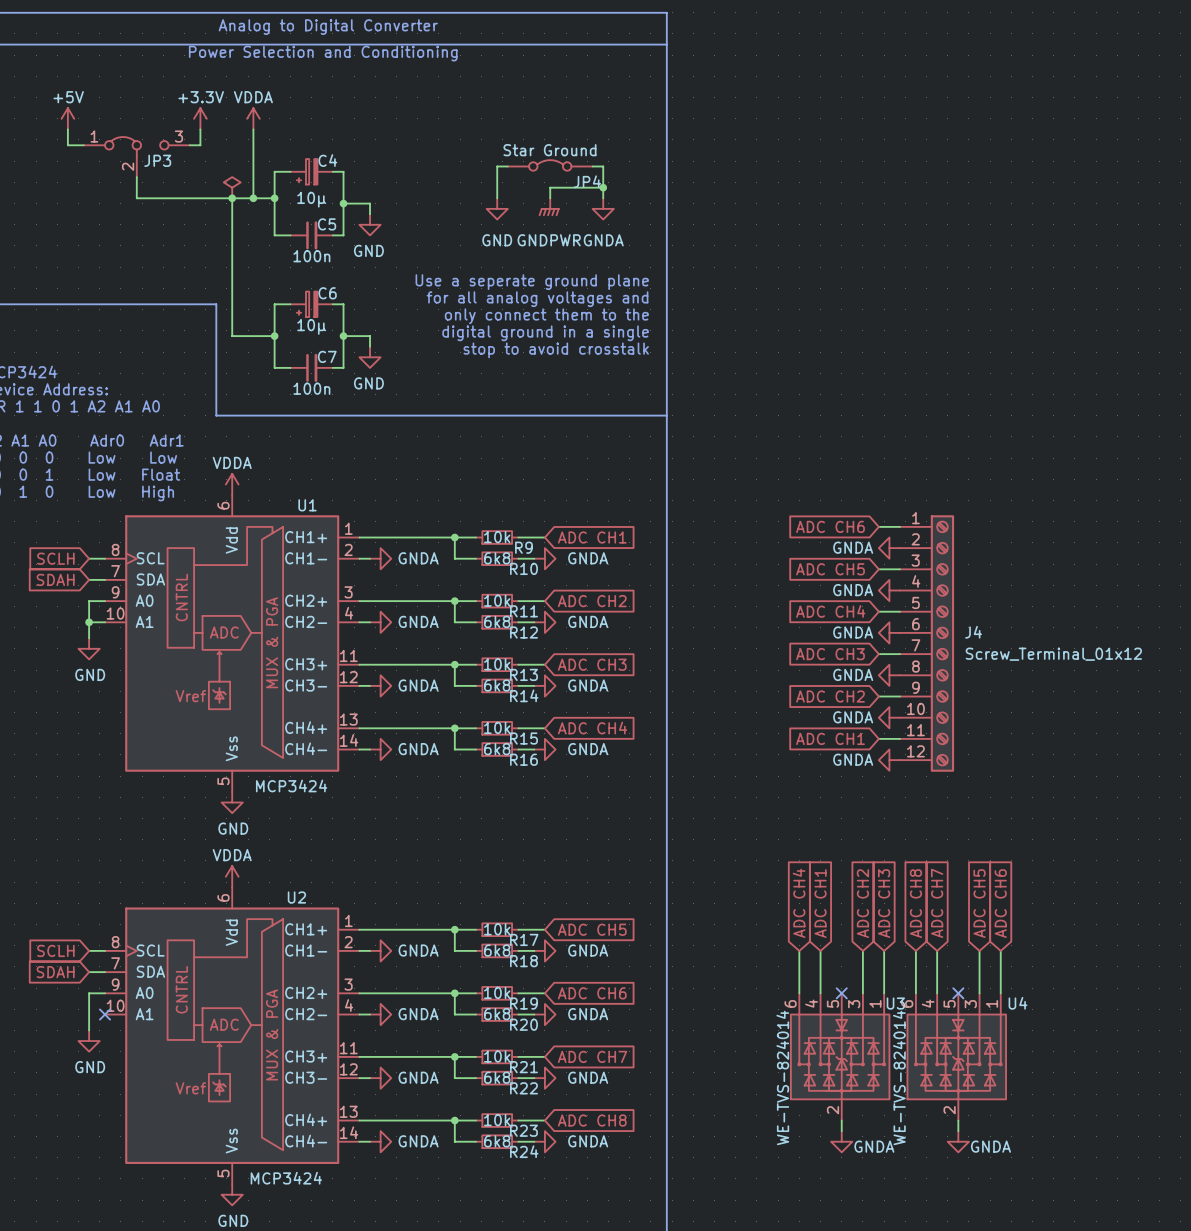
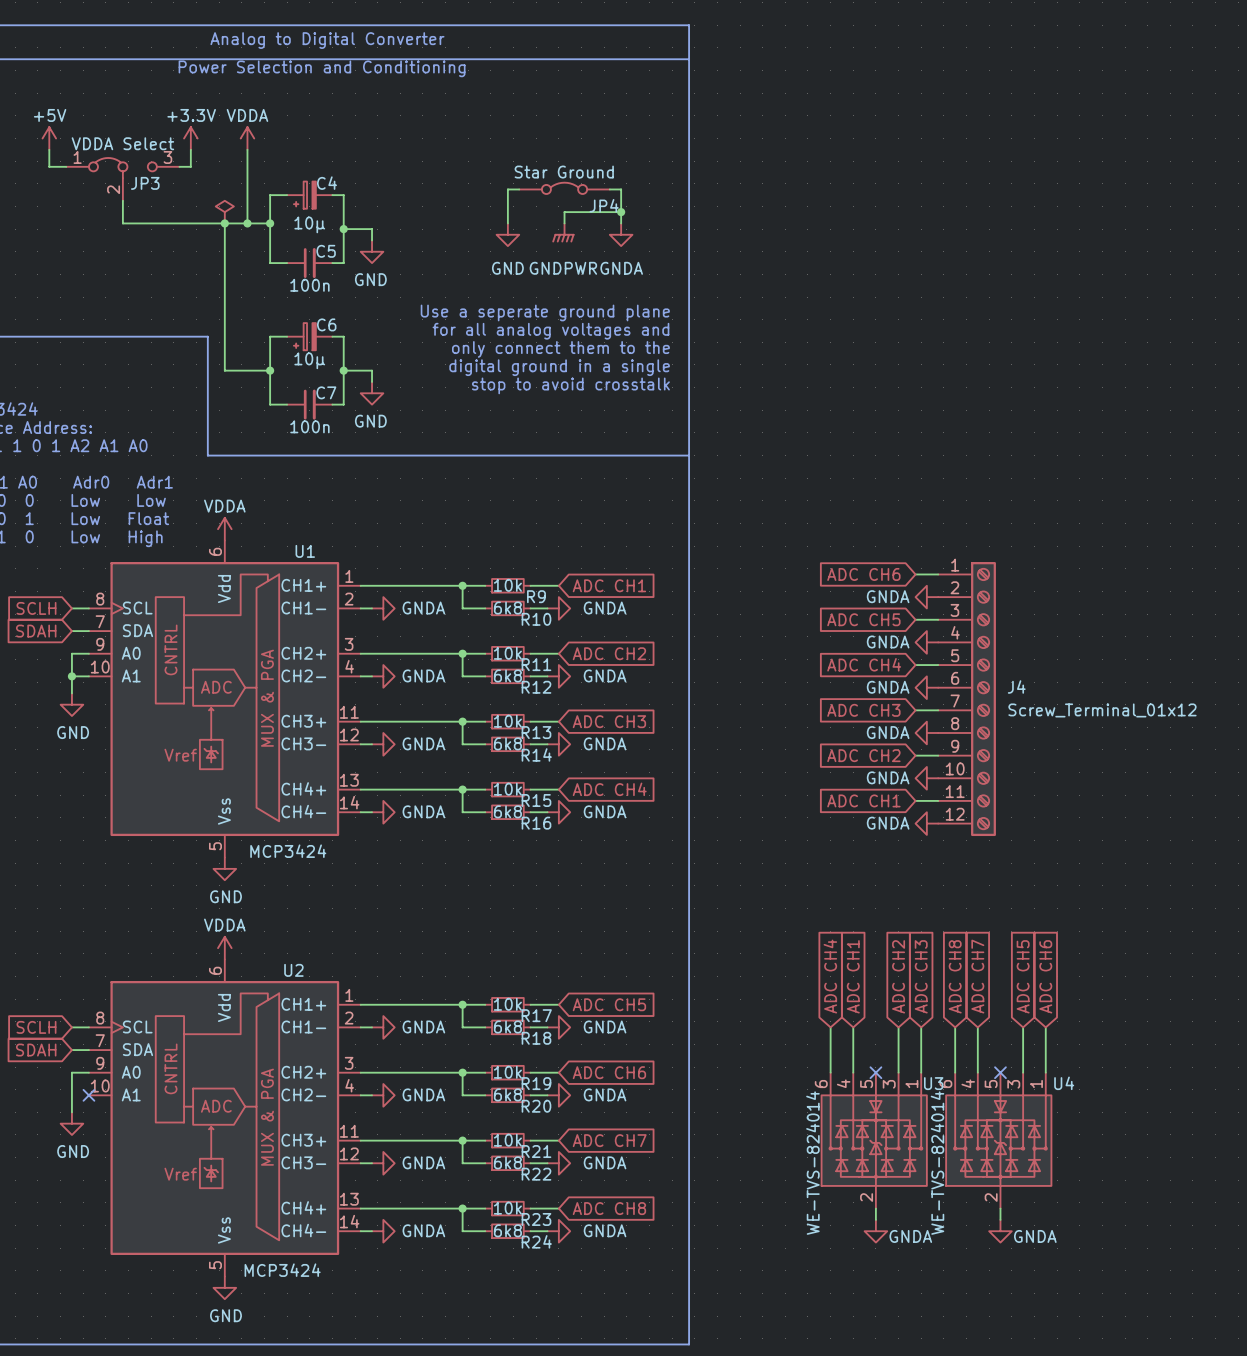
JP3 value: none -> VDDA Select (122, 143)

